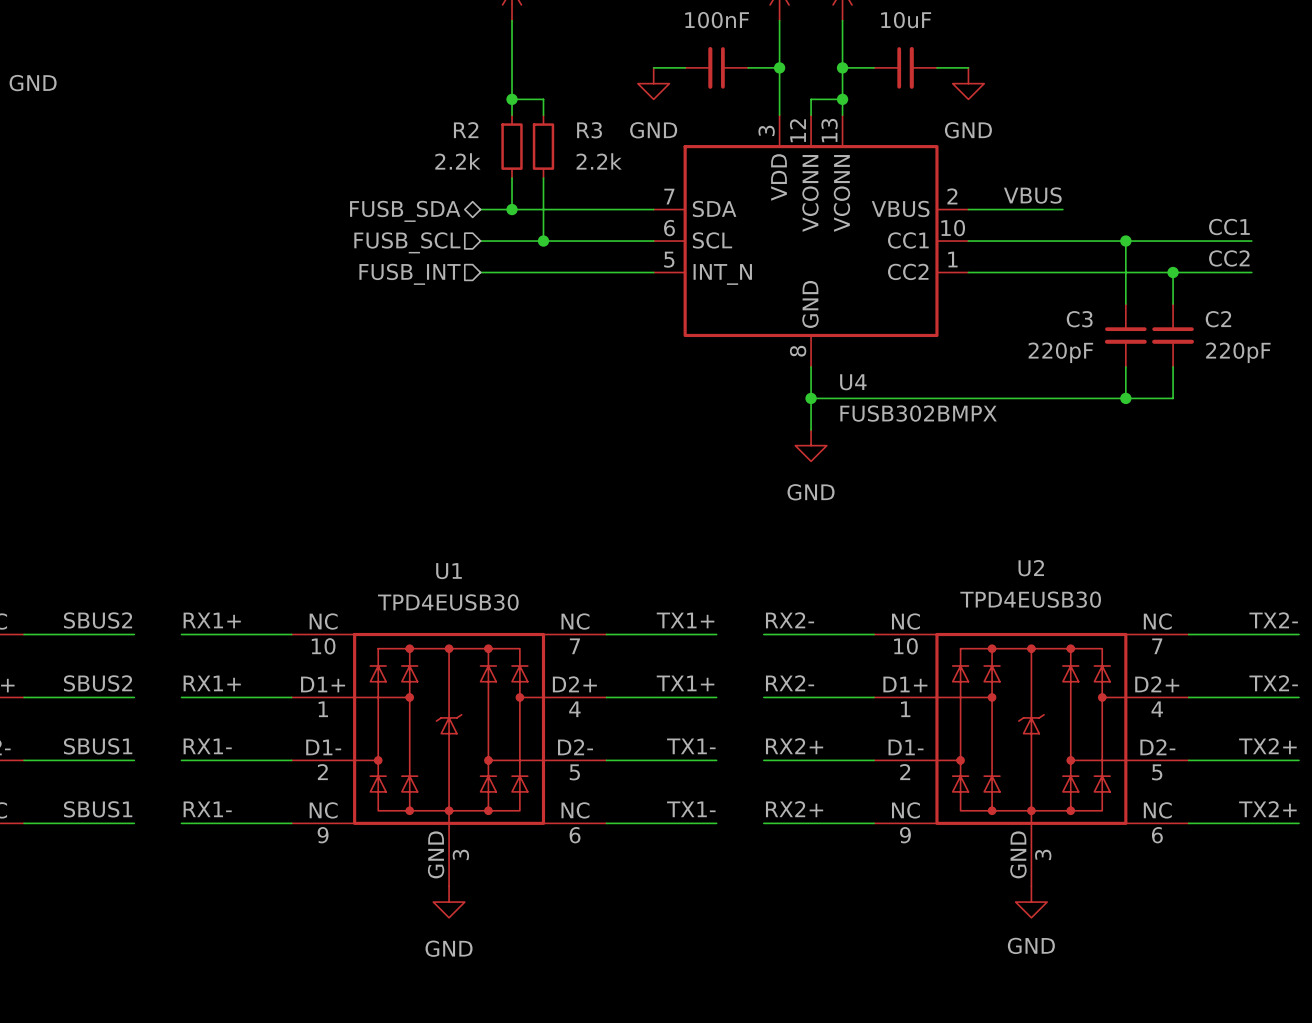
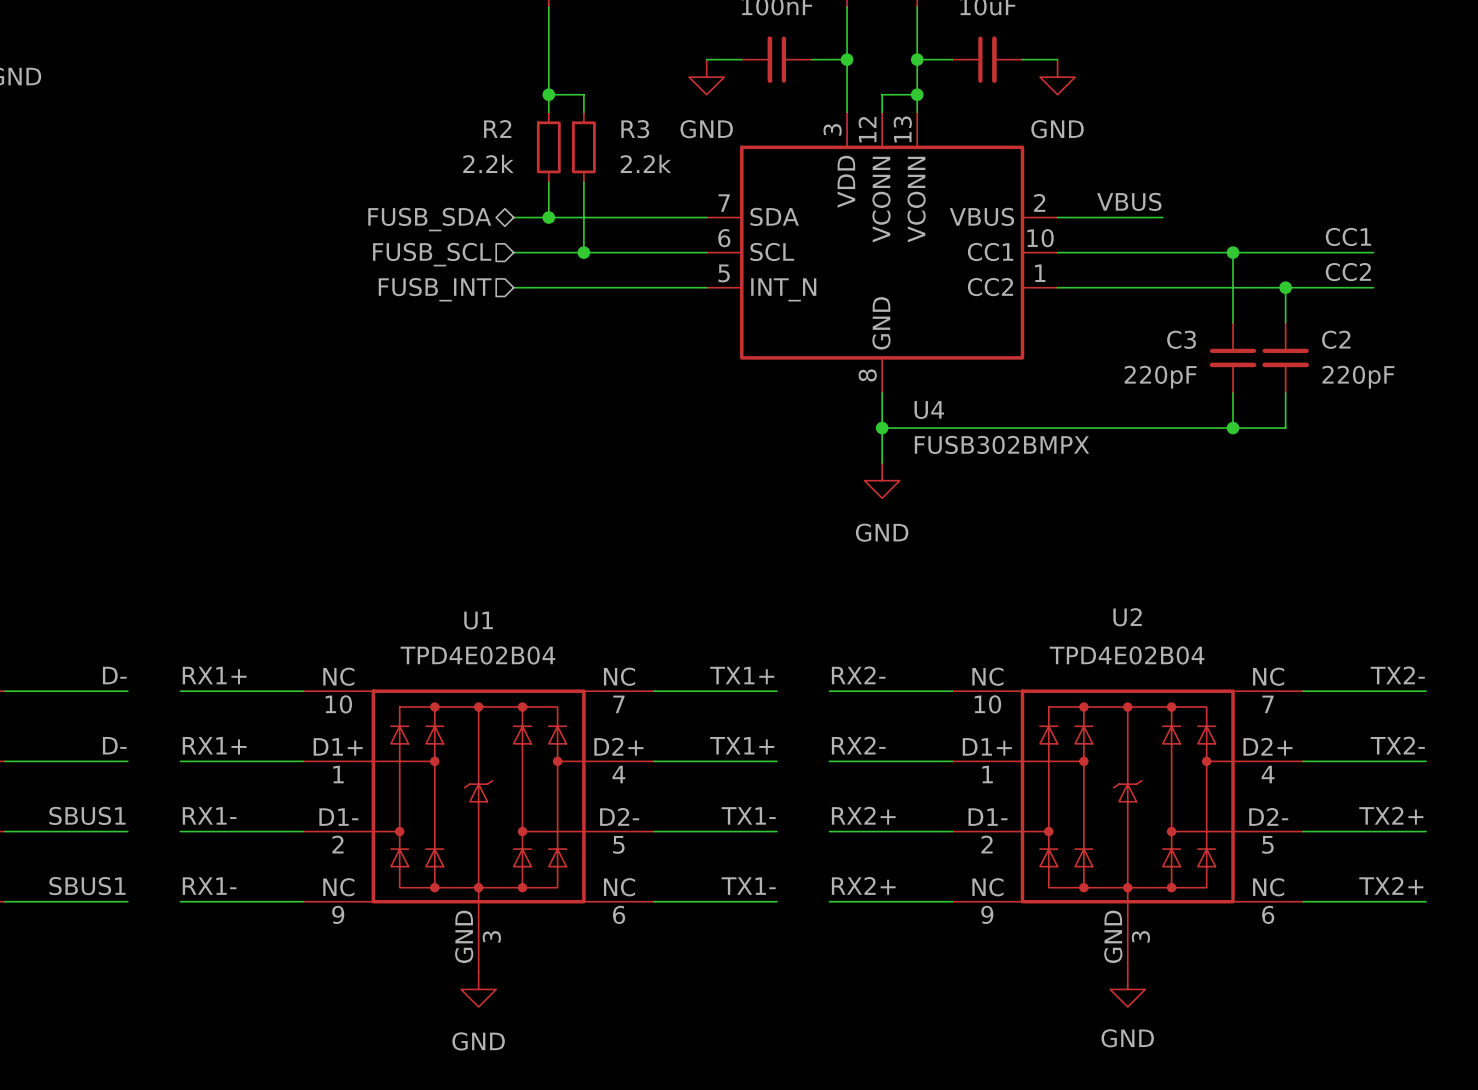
U2 value: TPD4EUSB30 (1030, 599) -> TPD4E02B04 (1127, 655)
U1 value: TPD4EUSB30 (448, 602) -> TPD4E02B04 (477, 655)
label: SBUS2 (98, 620) -> D- (114, 675)
label: SBUS2 (98, 683) -> D- (114, 745)

